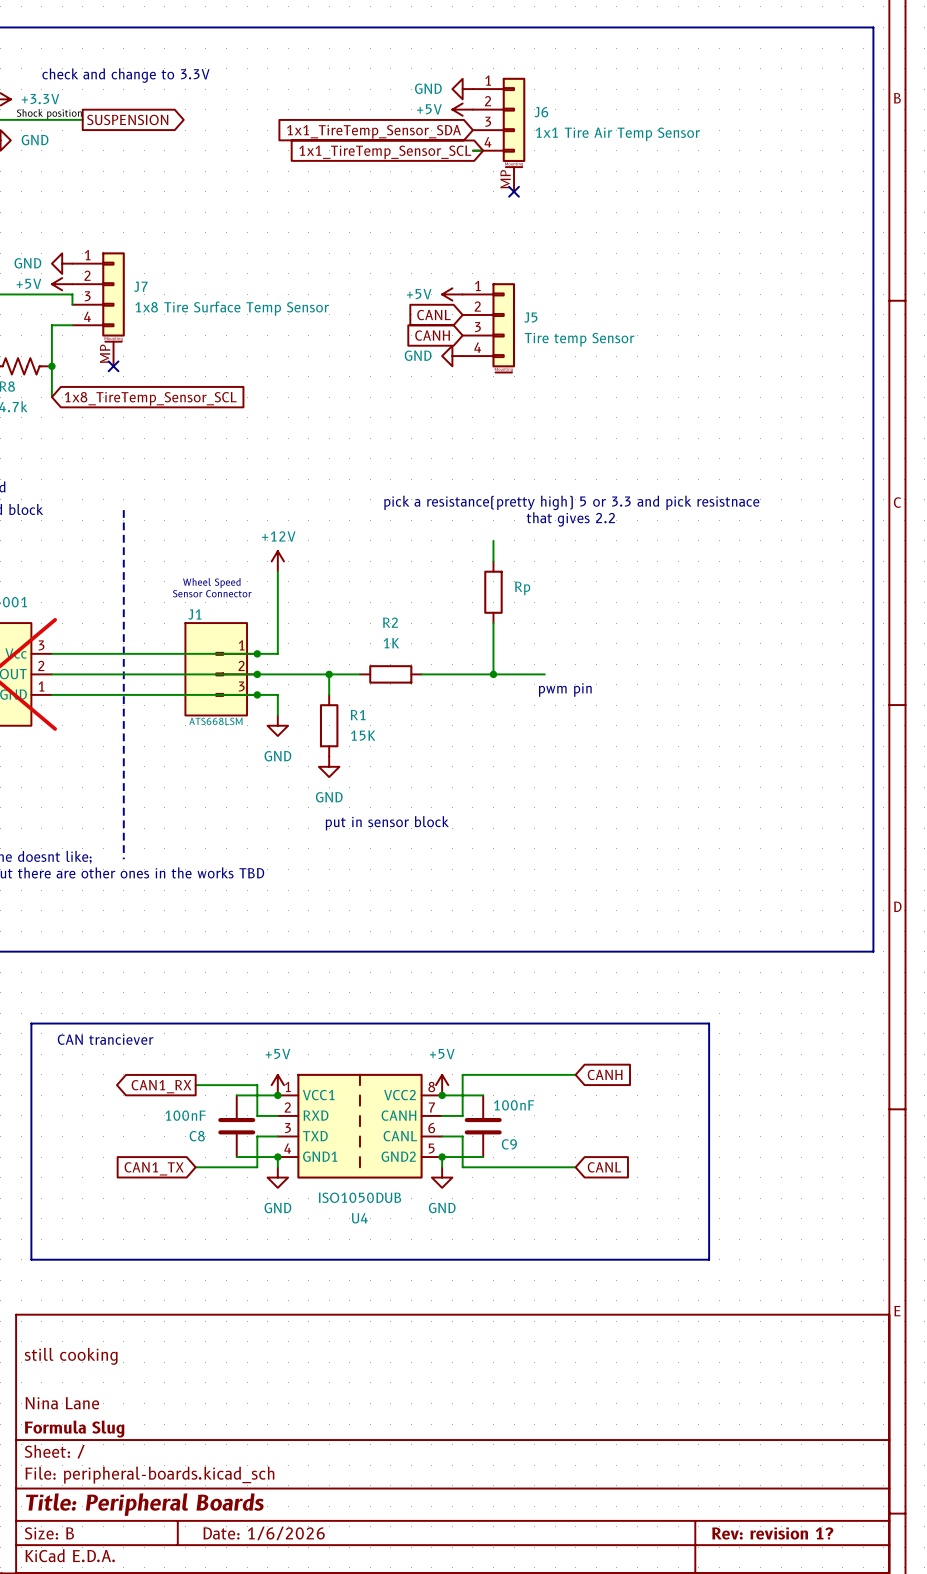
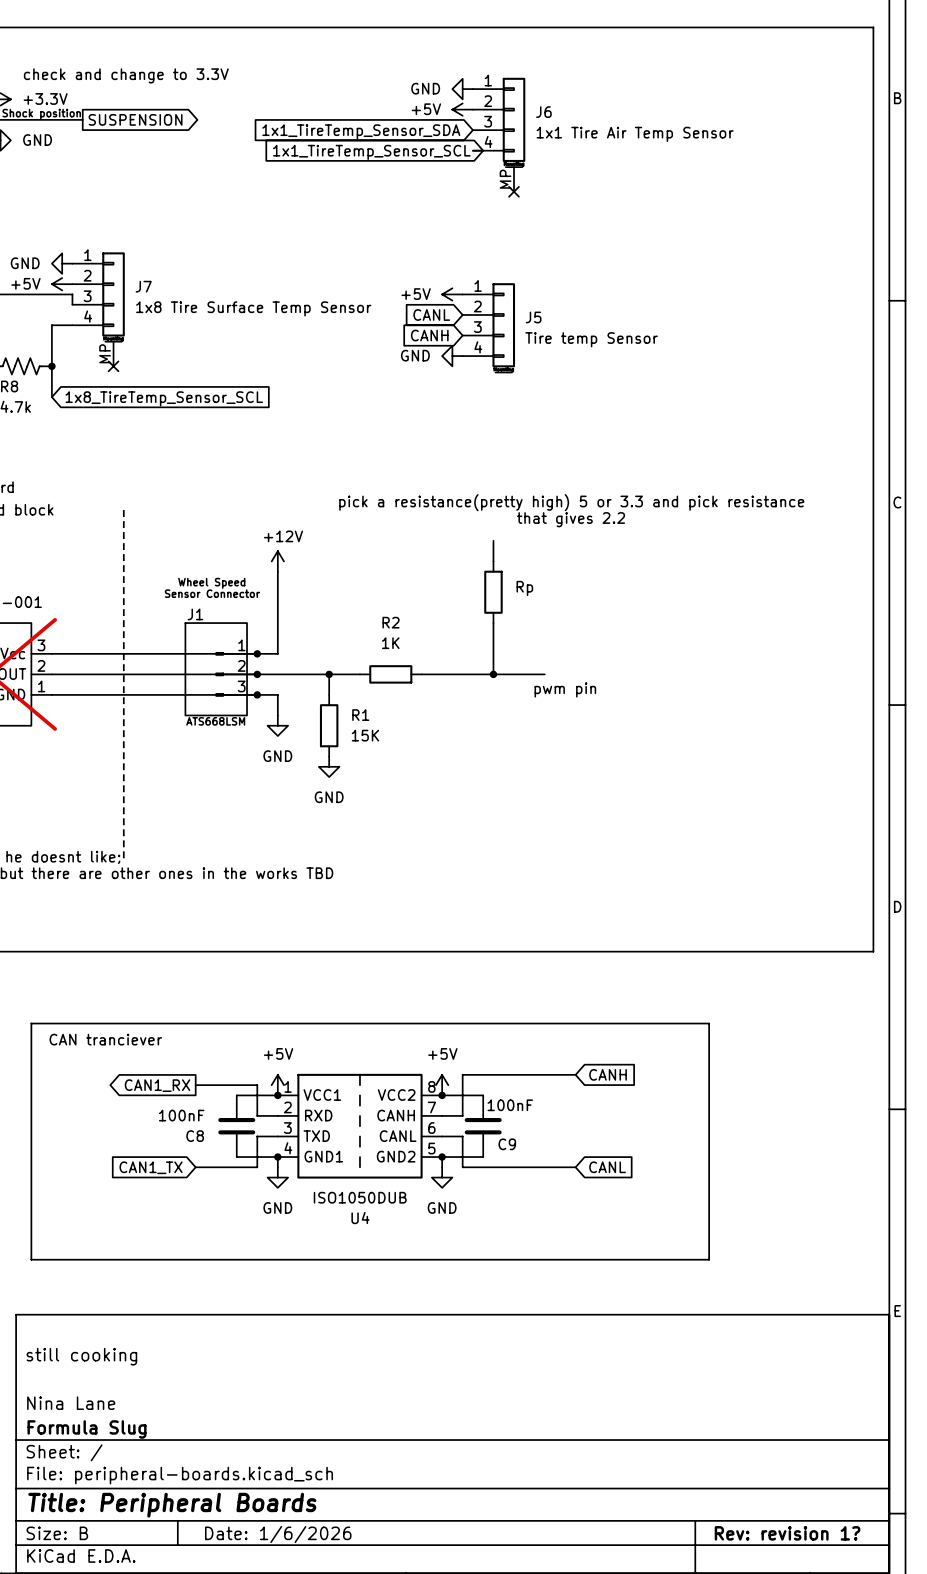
text: pick a resistance(pretty high) 5 or 3.3 and pick resistnace (571, 502) -> pick a resistance(pretty high) 5 or 3.3 and pick resistance (571, 502)
text: put in sensor block (387, 823) -> none

